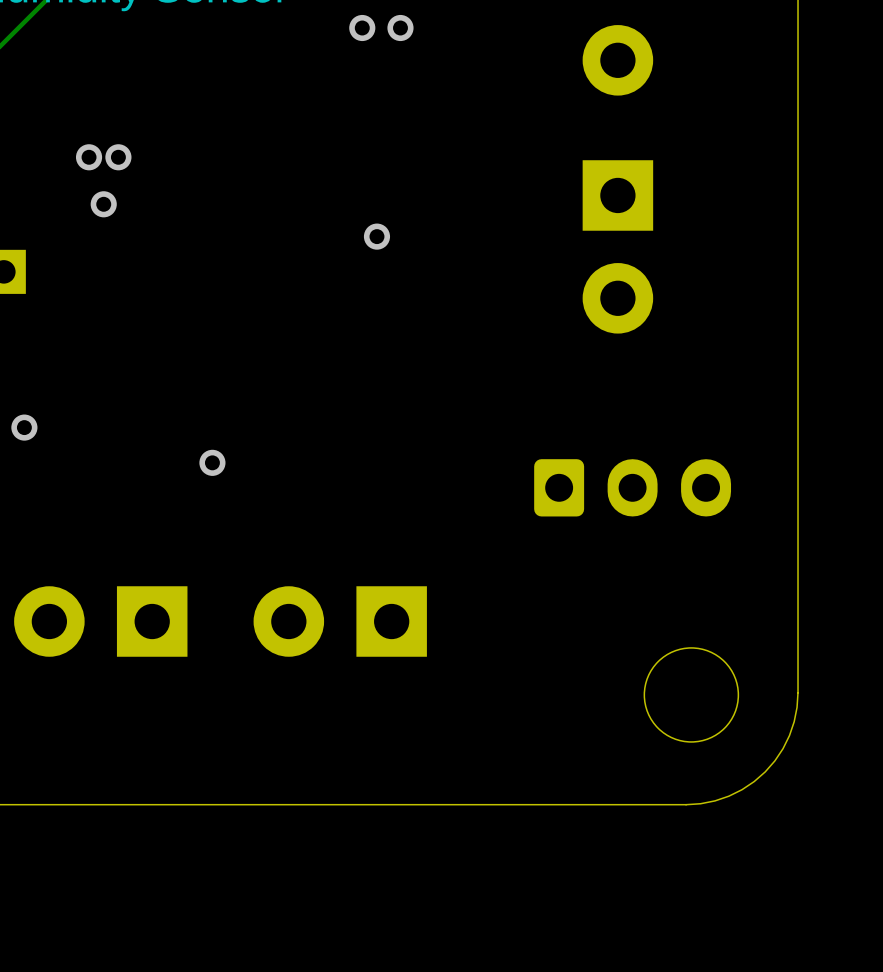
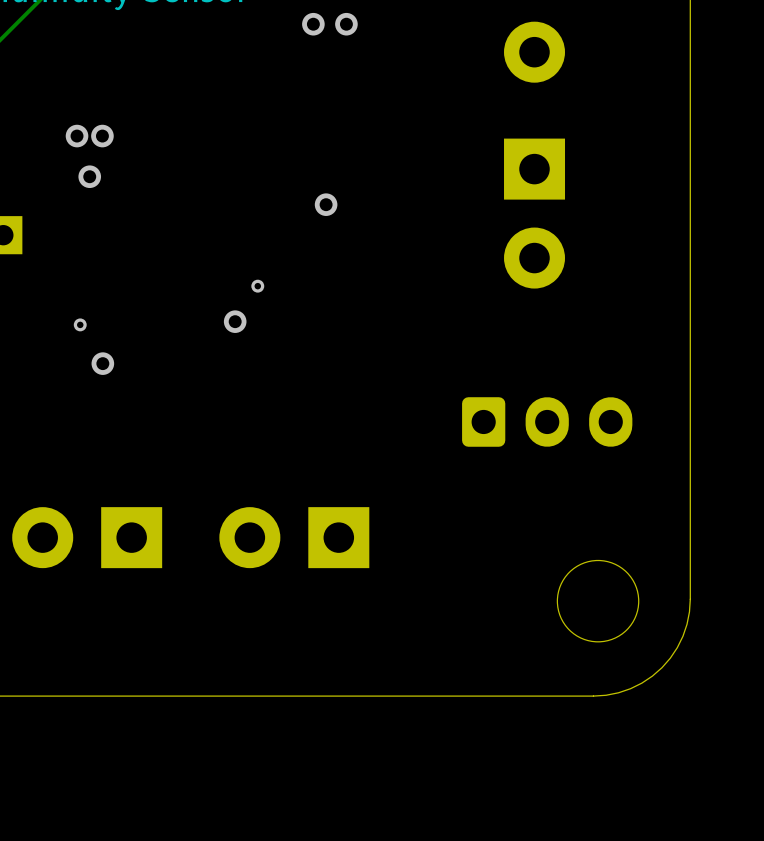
via: none -> (257, 286)
via: none -> (235, 321)
via: none -> (80, 324)
via: none -> (102, 363)
via: (24, 427) -> none
via: (212, 462) -> none

